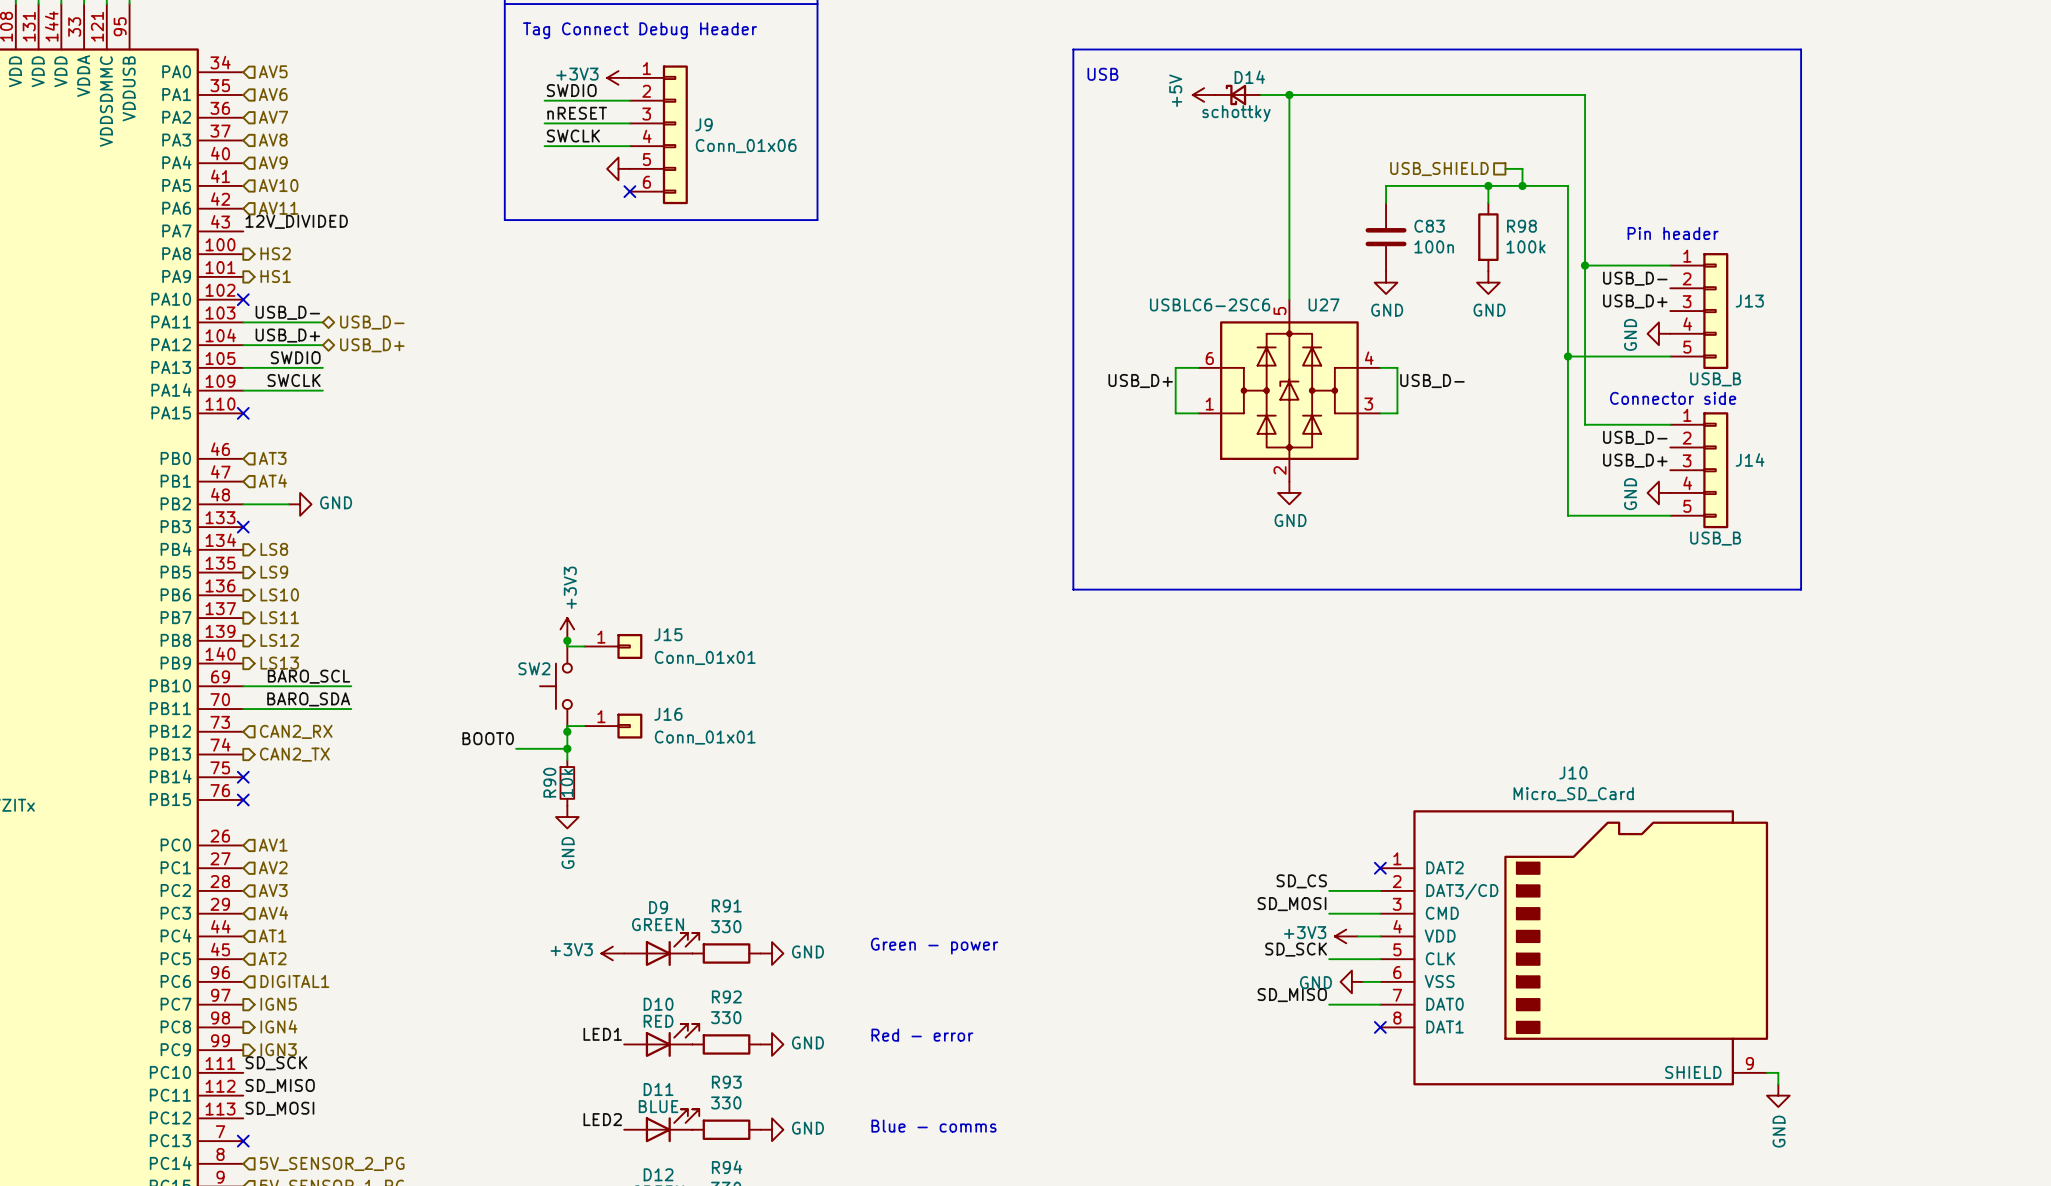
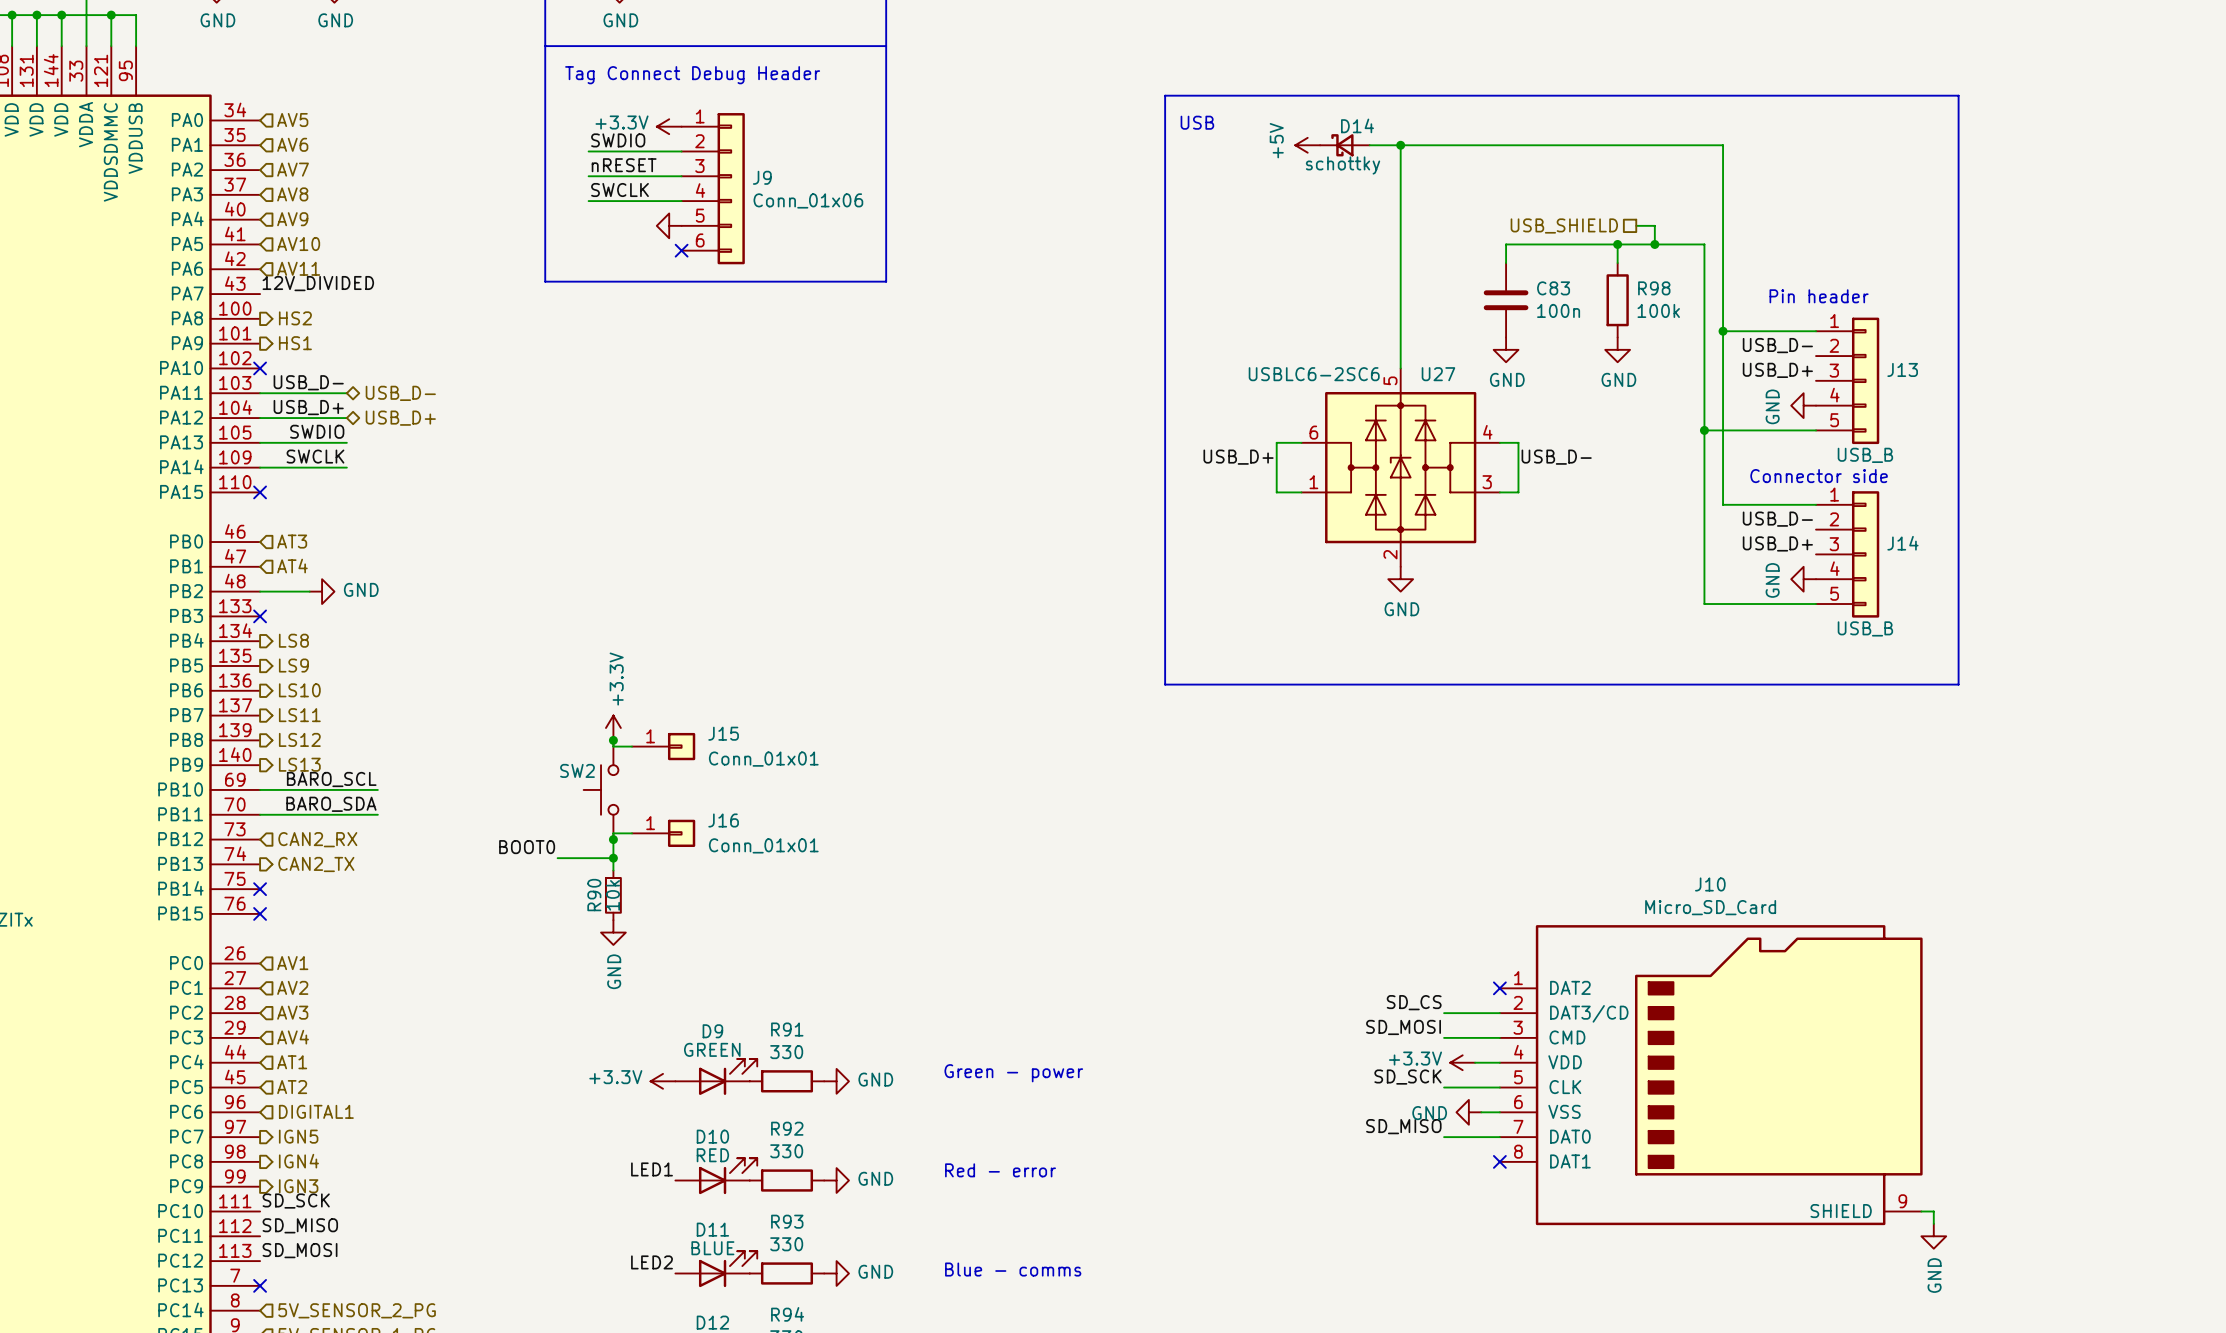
power symbol: +3V3 (618, 77) -> +3.3V (669, 126)
power symbol: +3V3 (567, 629) -> +3.3V (613, 727)
power symbol: +3V3 (1346, 936) -> +3.3V (1462, 1062)
power symbol: +3V3 (612, 953) -> +3.3V (663, 1081)

